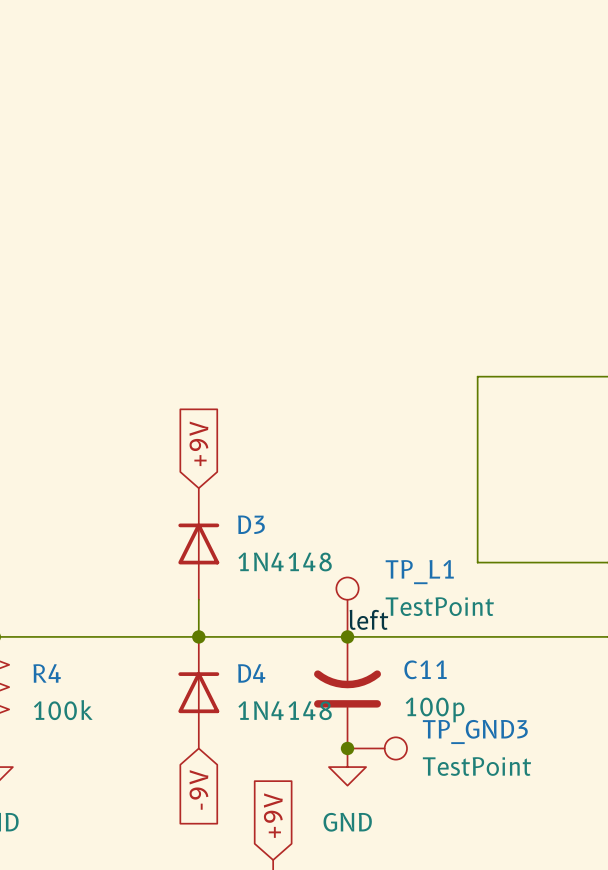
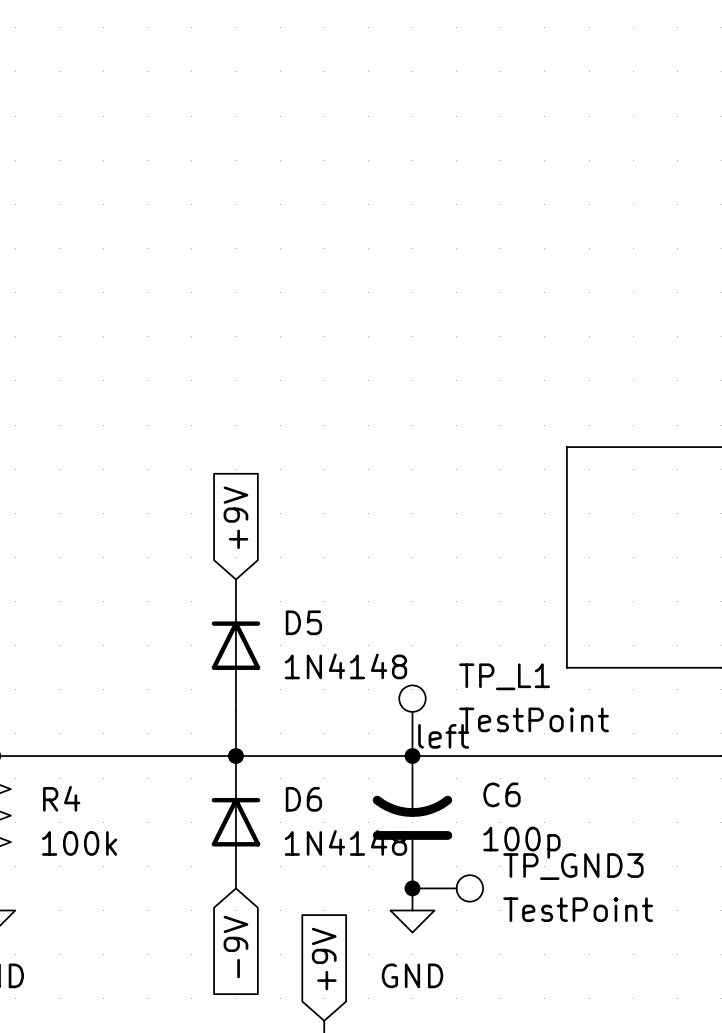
D3 name: D3 (251, 524) -> D5 (303, 622)
C11 name: C11 (425, 669) -> C6 (501, 794)
D4 name: D4 (251, 673) -> D6 (303, 799)

